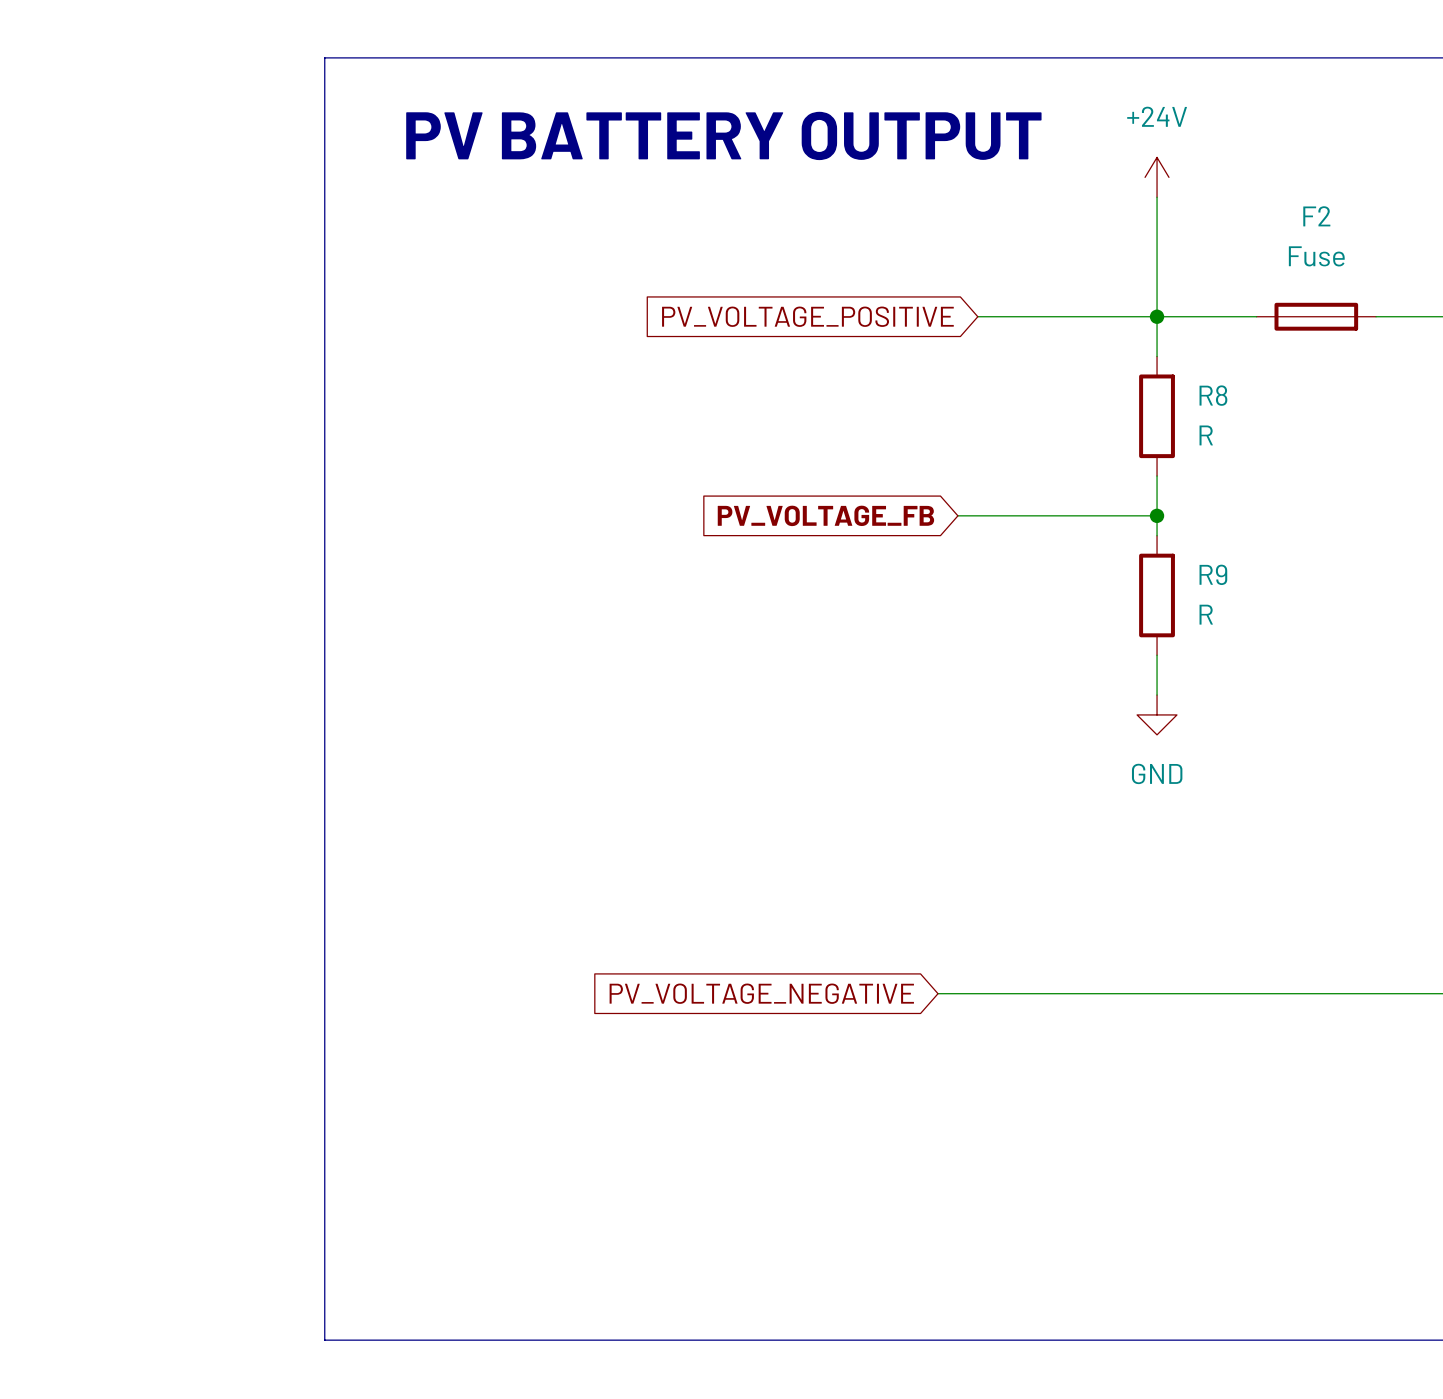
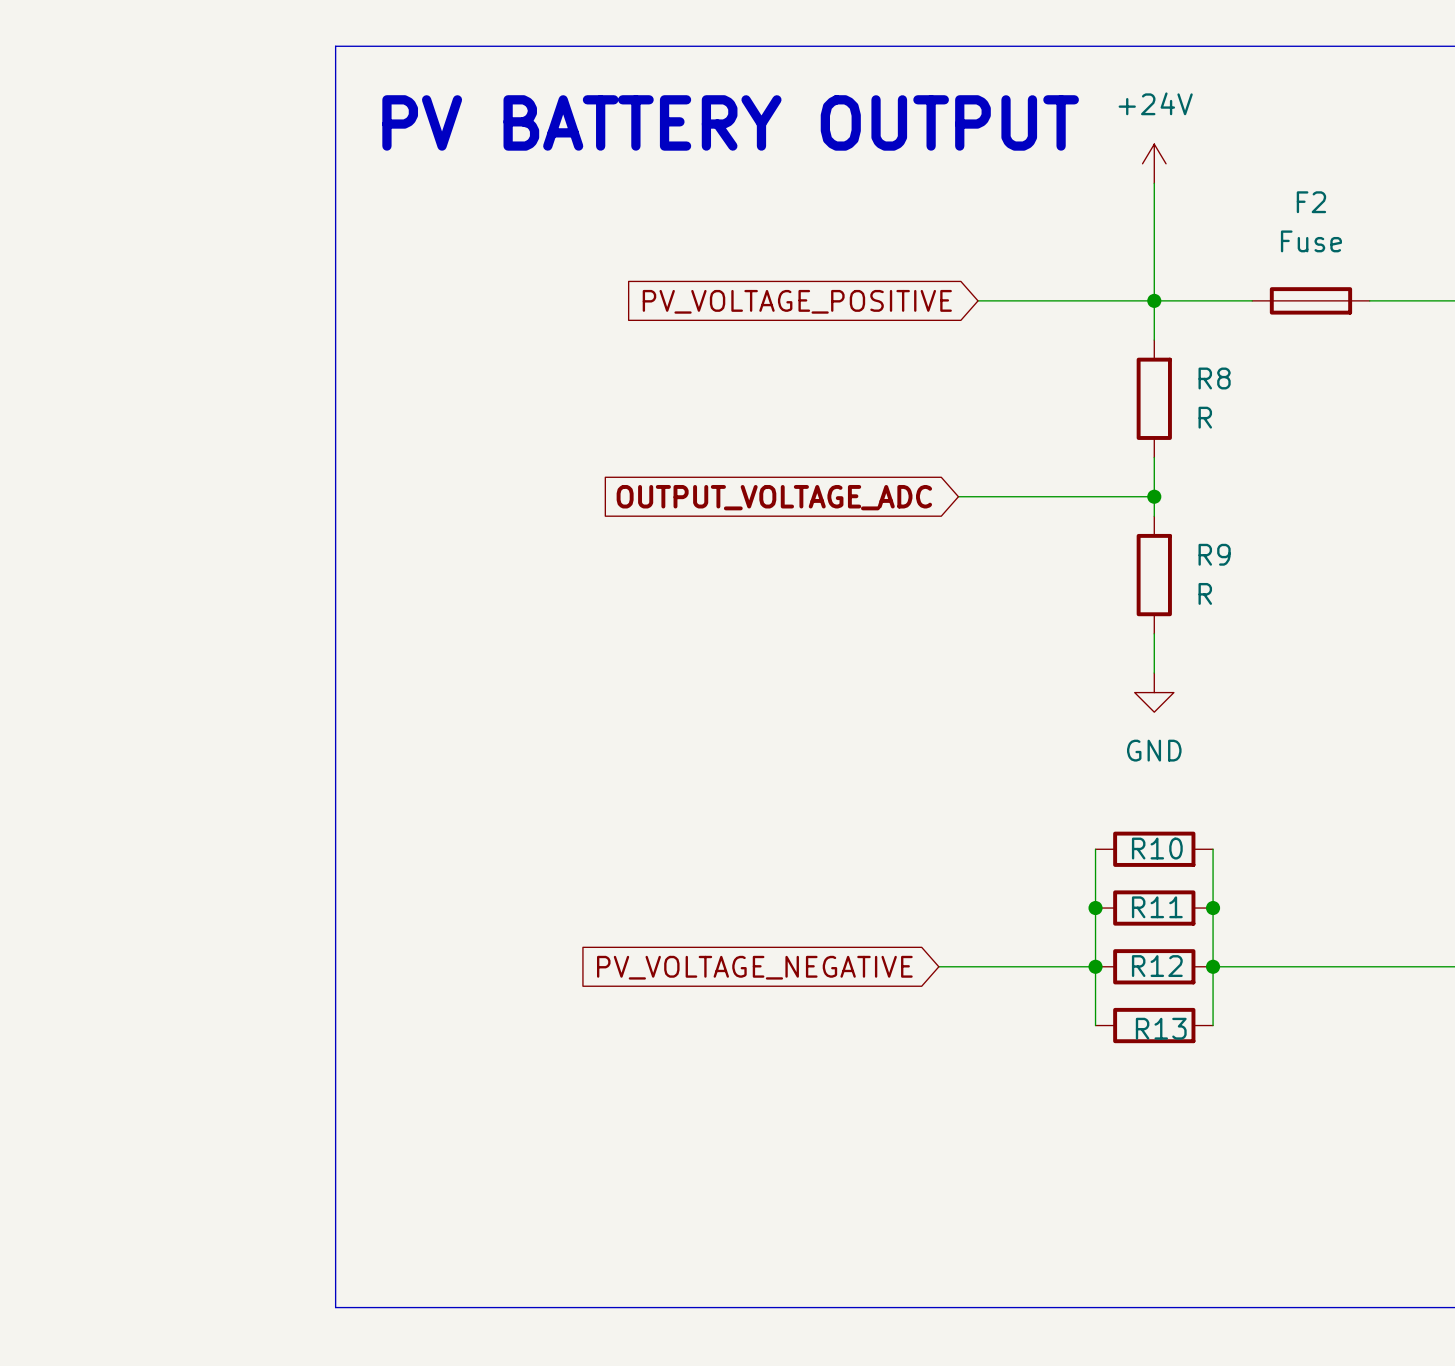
global label: PV_VOLTAGE_FB (825, 515) -> OUTPUT_VOLTAGE_ADC (774, 497)
wire: none -> (1095, 849) (1095, 1025)
R10: none -> (1154, 849)
wire: none -> (1213, 849) (1213, 1025)
junction: none -> (1095, 908)
R11: none -> (1154, 908)
junction: none -> (1213, 908)
wire: (1097, 993) (1216, 993) -> none
junction: none -> (1095, 966)
R12: none -> (1154, 966)
junction: none -> (1213, 966)
R13: none -> (1154, 1025)

